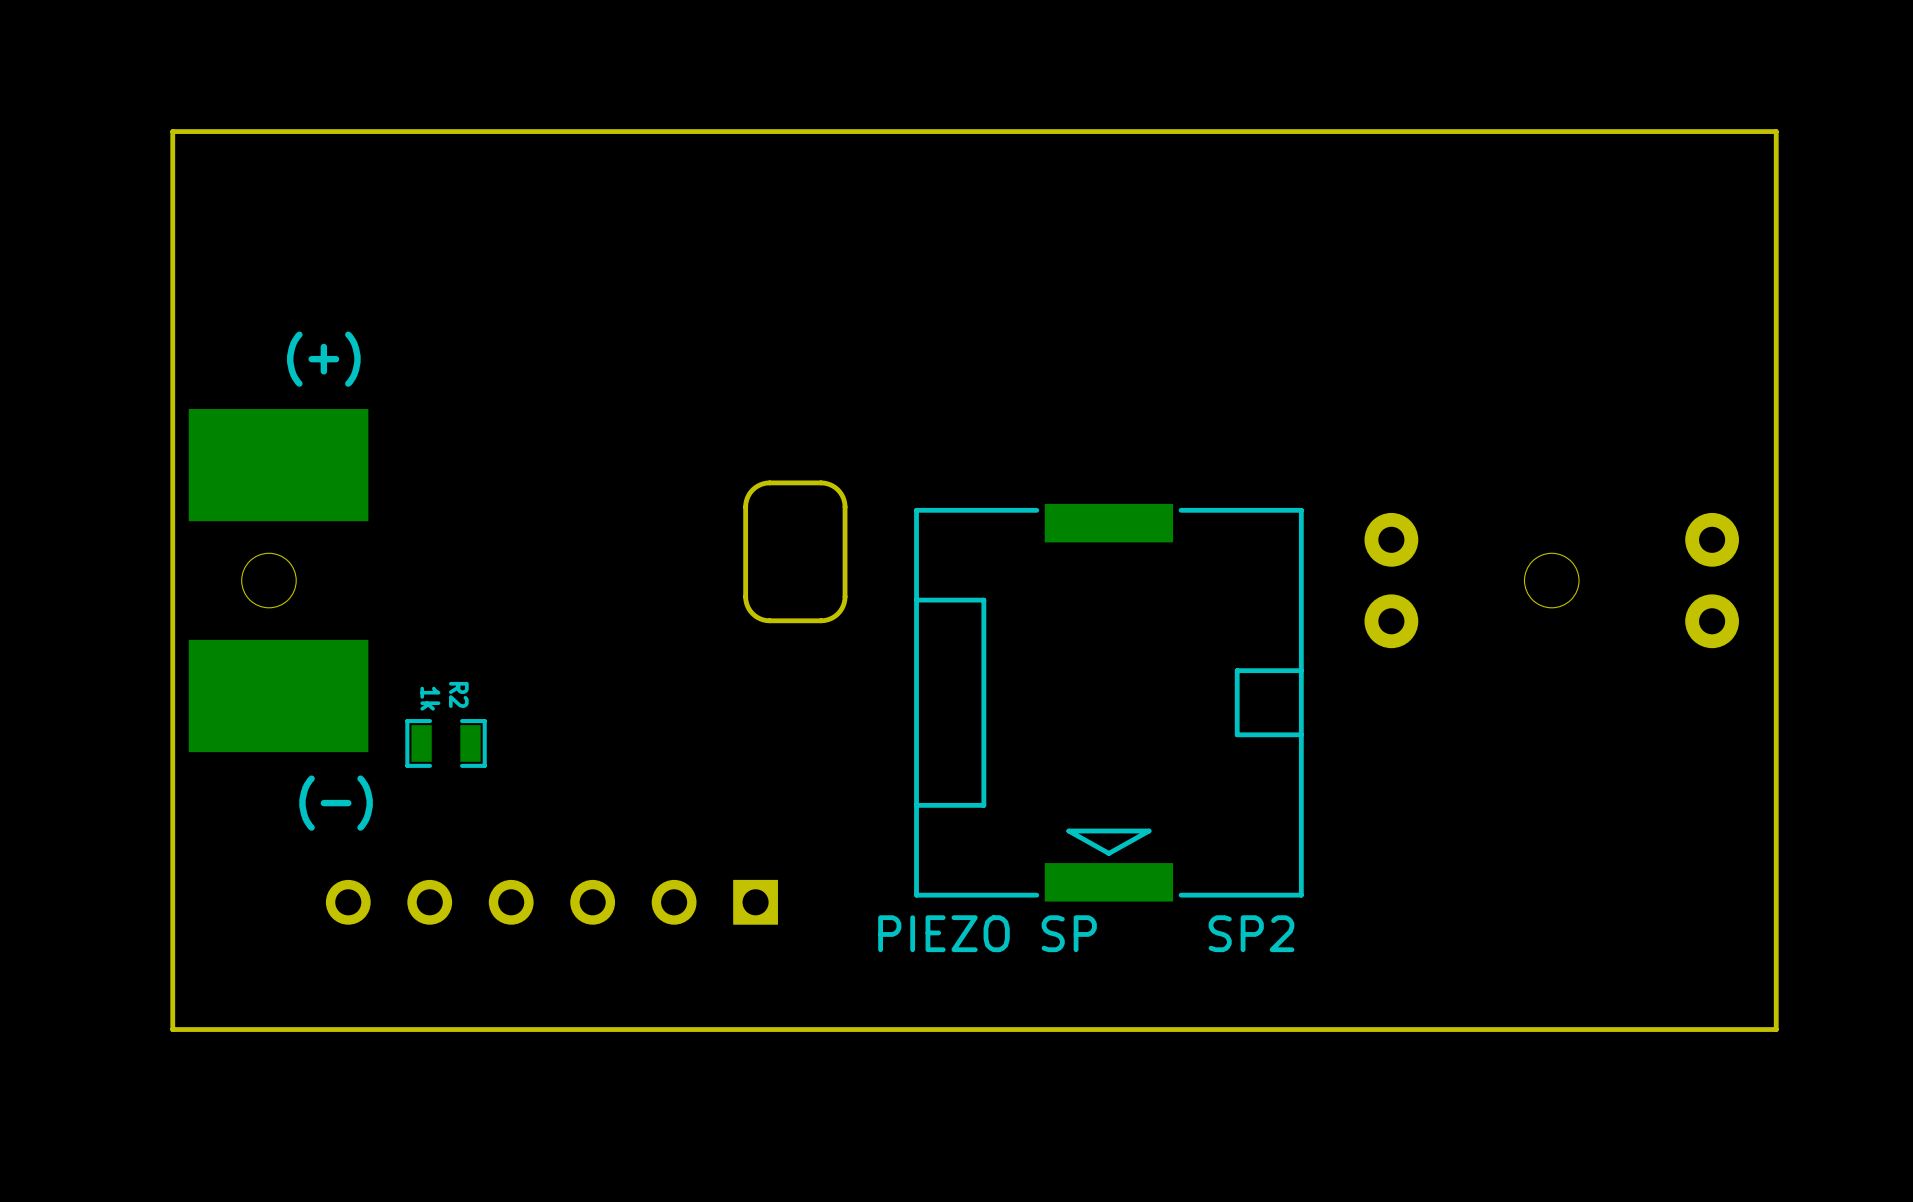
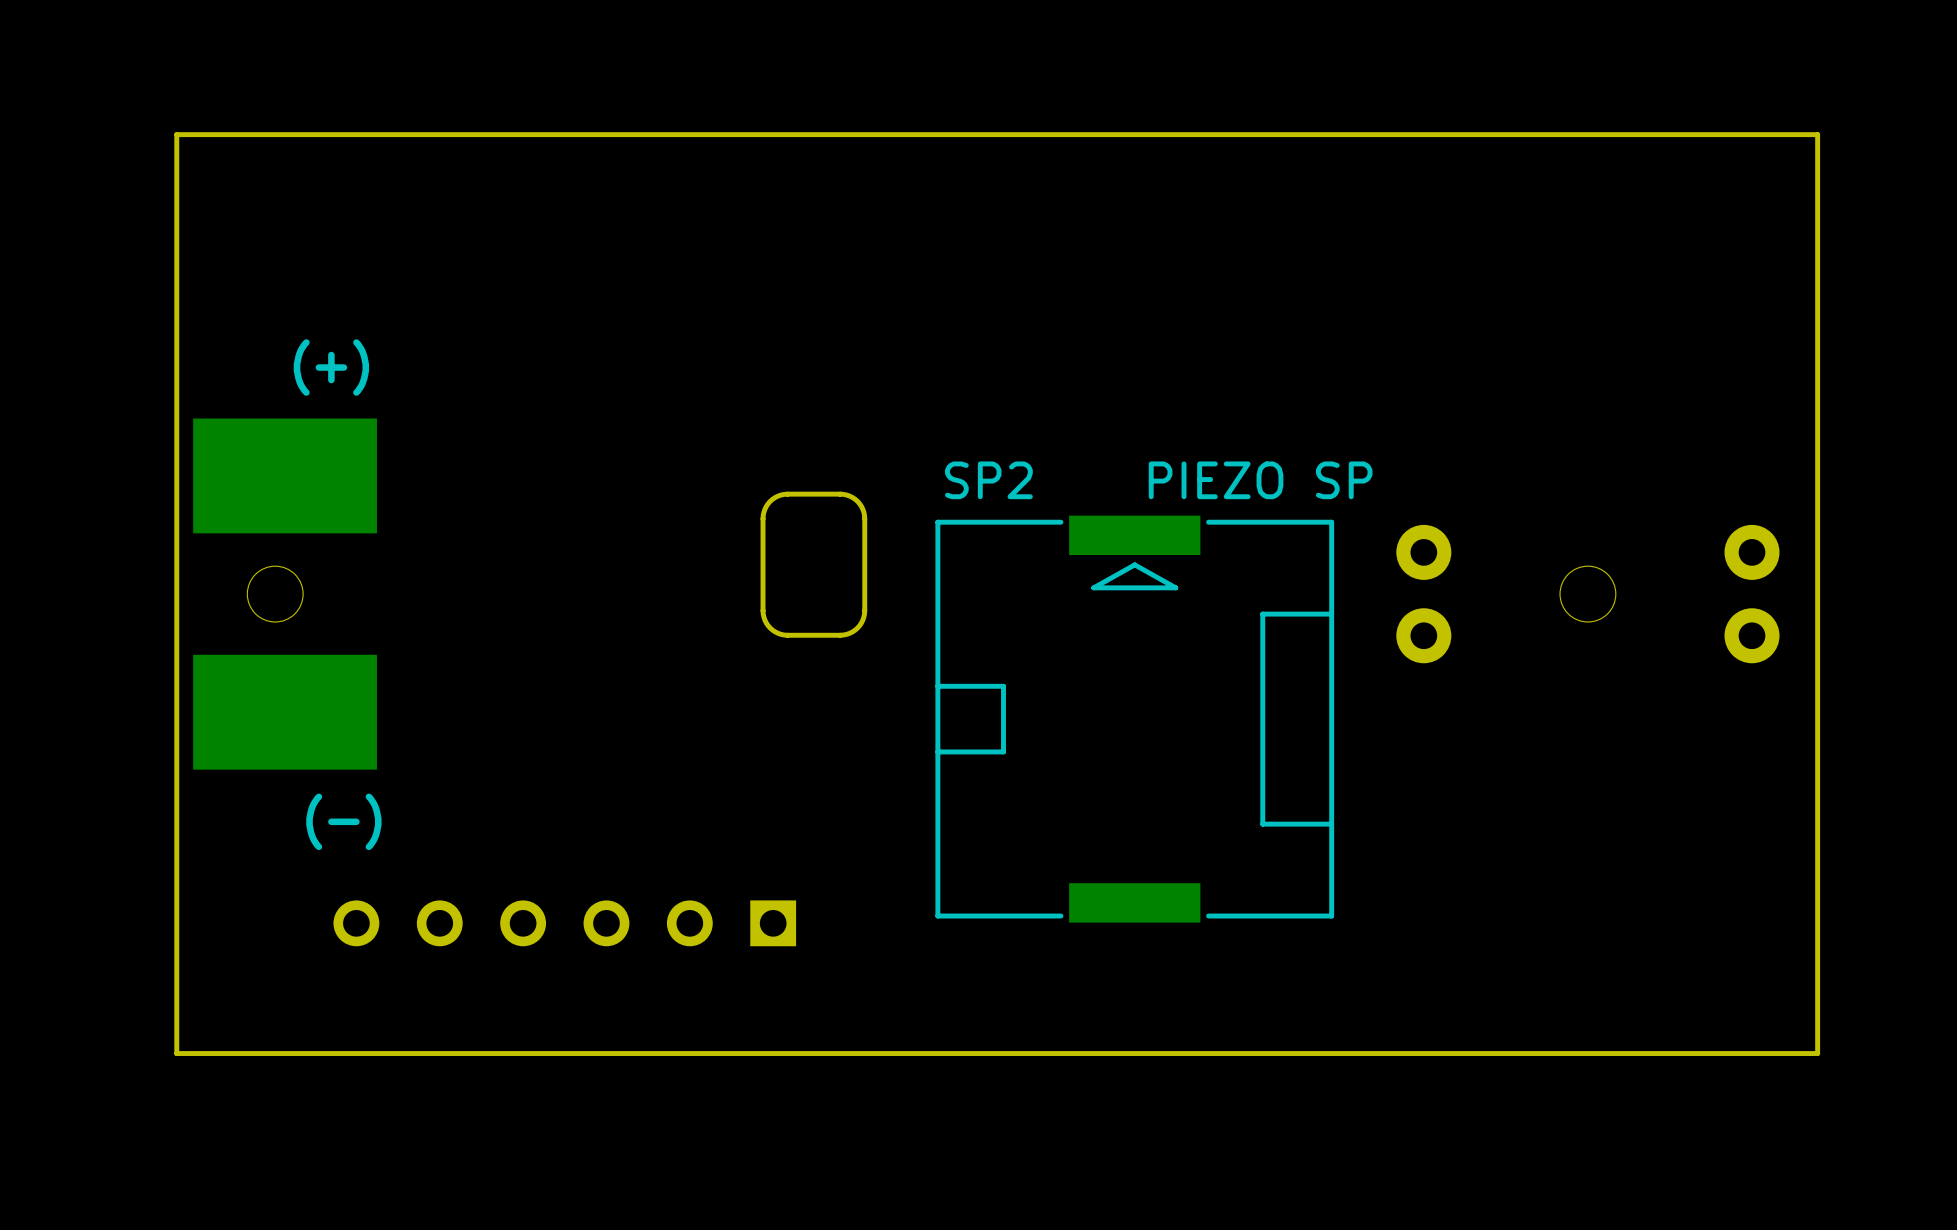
SP2 rotation: 0° (1108, 702) -> 180° (1134, 719)
R2: 1k (446, 743) -> none

